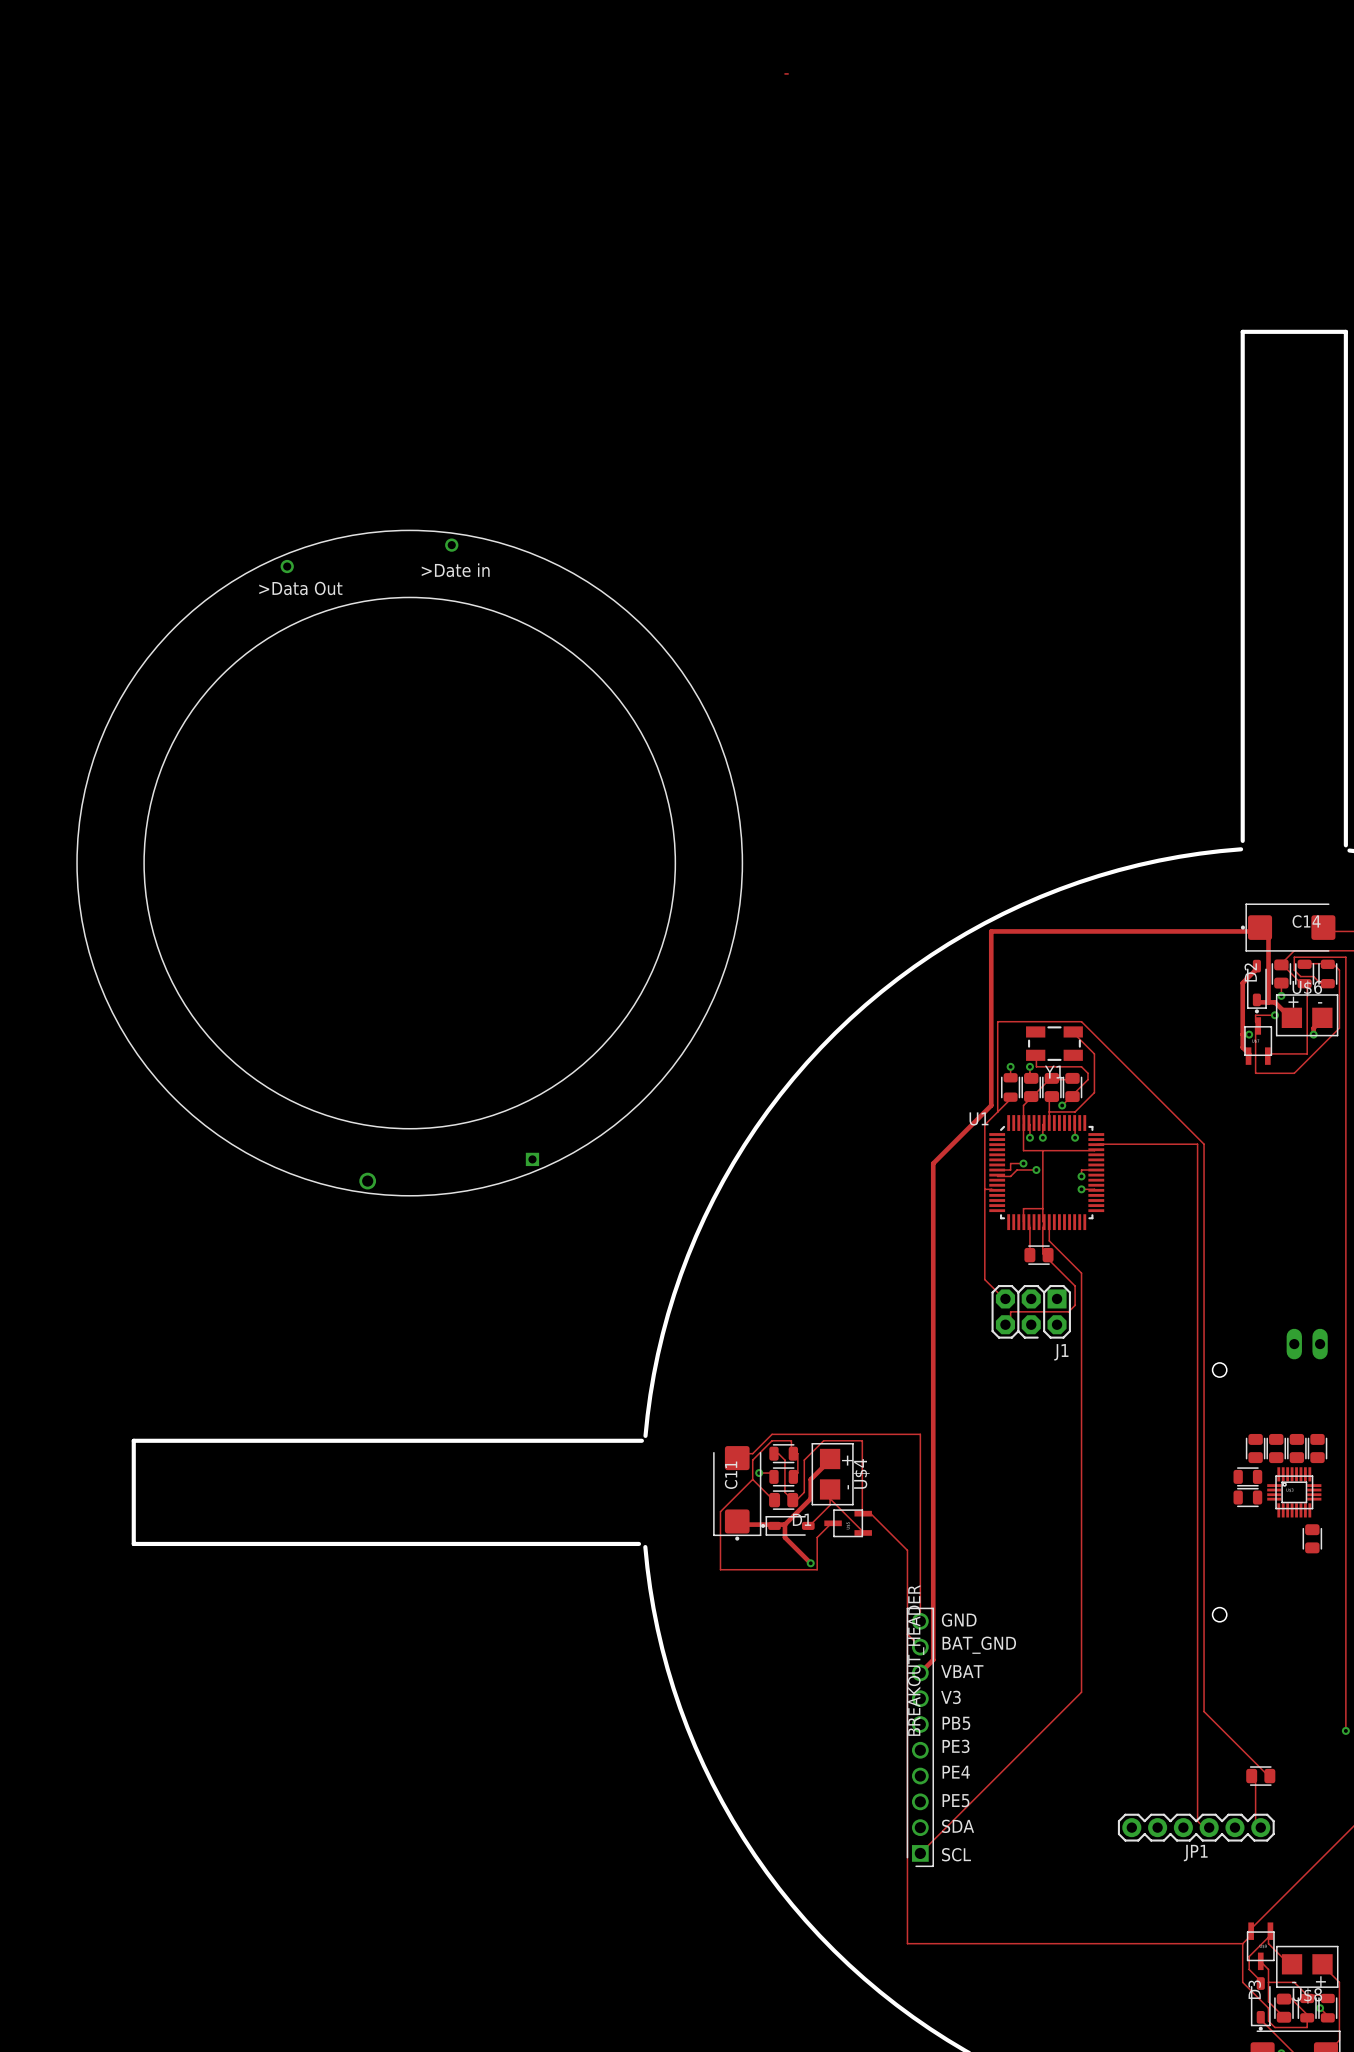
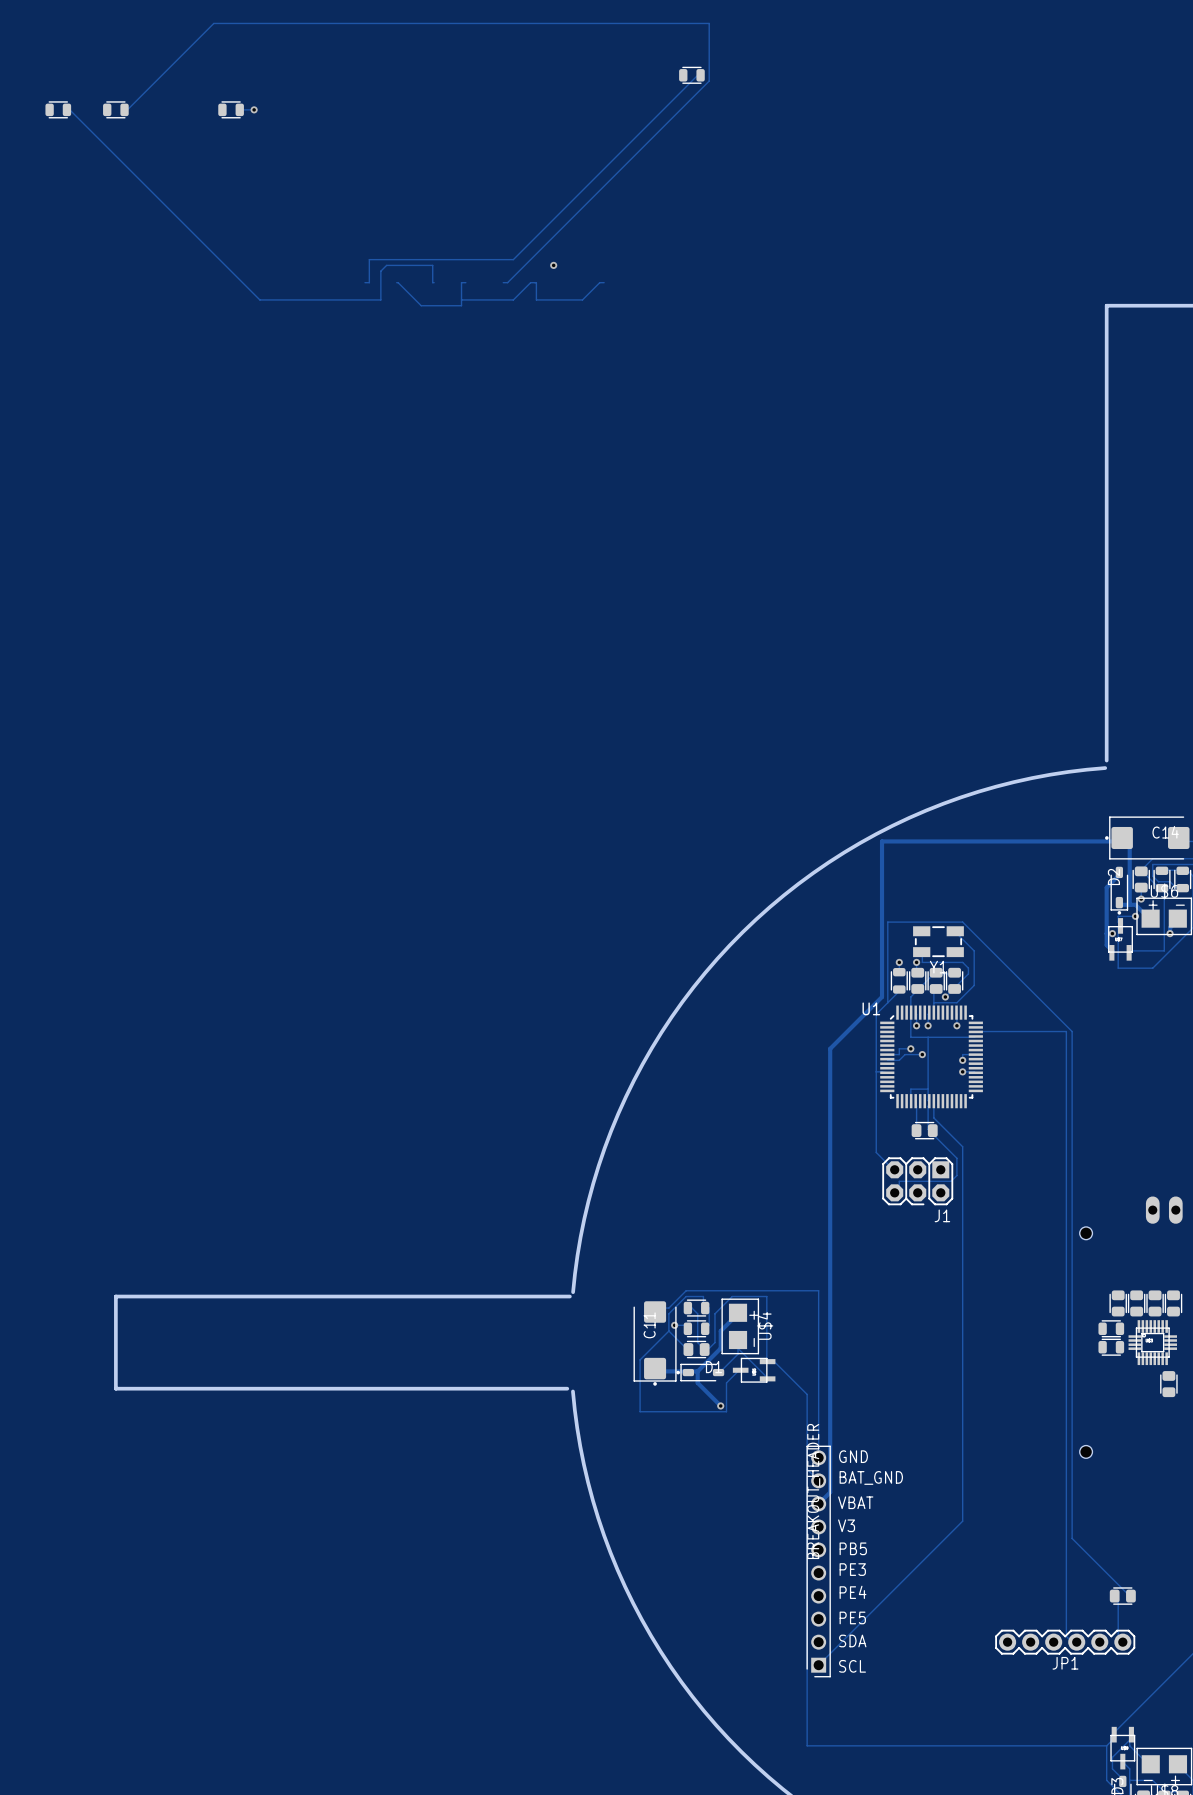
part: none -> (691, 75)
track: none -> (697, 75) (513, 259) (369, 259) (369, 282) (364, 282)
part: none -> (58, 109)
track: none -> (66, 109) (69, 109) (259, 299) (380, 299) (380, 271) (386, 265) (432, 265) (434, 282)
part: none -> (115, 109)
track: none -> (124, 109) (127, 109) (213, 23) (709, 23) (709, 81) (507, 282) (503, 282)
part: none -> (231, 109)
track: none -> (239, 109) (254, 109)
via: none -> (254, 109)
via: none -> (553, 265)
track: none -> (396, 282) (421, 305) (461, 305) (461, 282) (465, 282)
track: none -> (604, 282) (599, 282) (582, 299) (536, 299) (536, 282) (530, 282) (513, 299) (461, 299)
part: (409, 863) -> none

